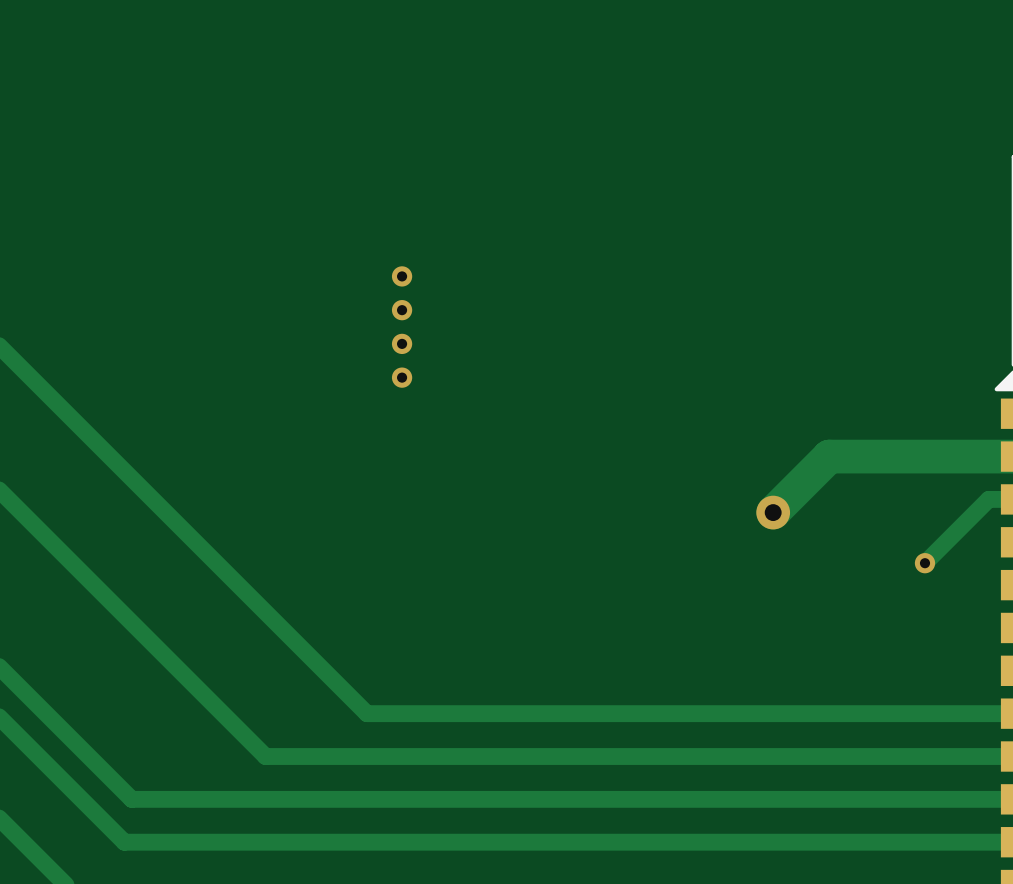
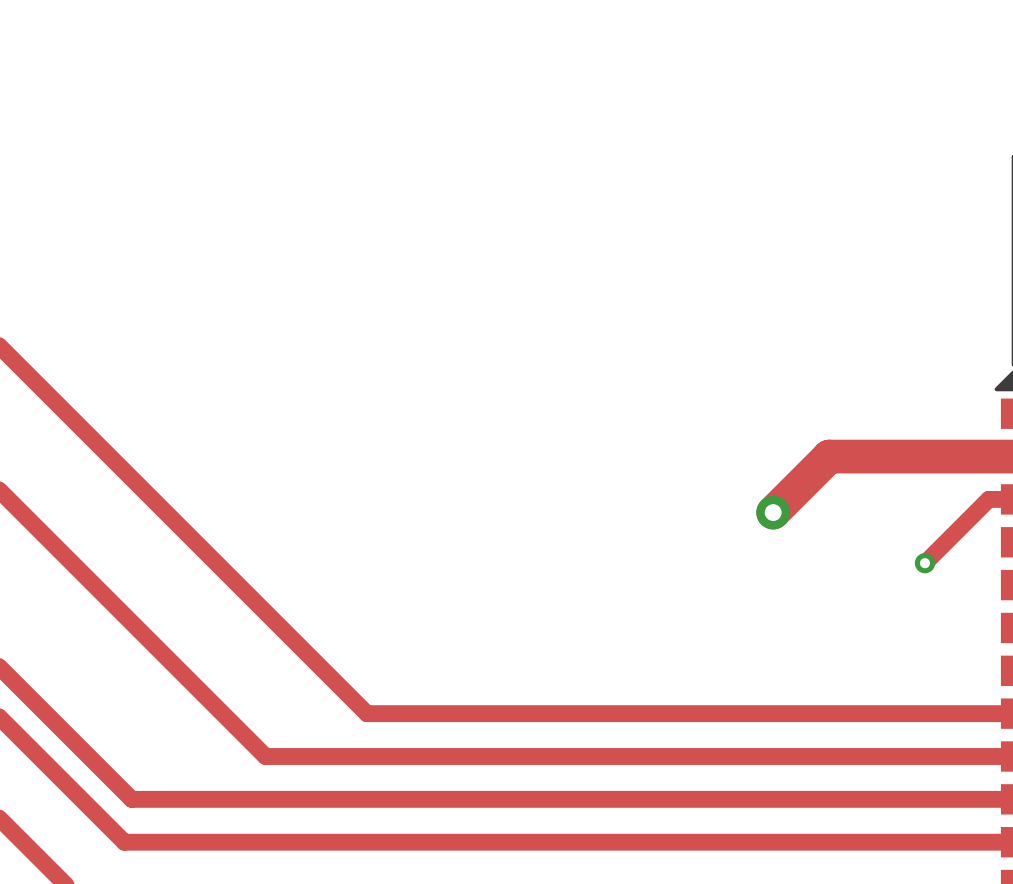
via: (402, 276) -> none
via: (402, 310) -> none
via: (402, 343) -> none
via: (402, 377) -> none

